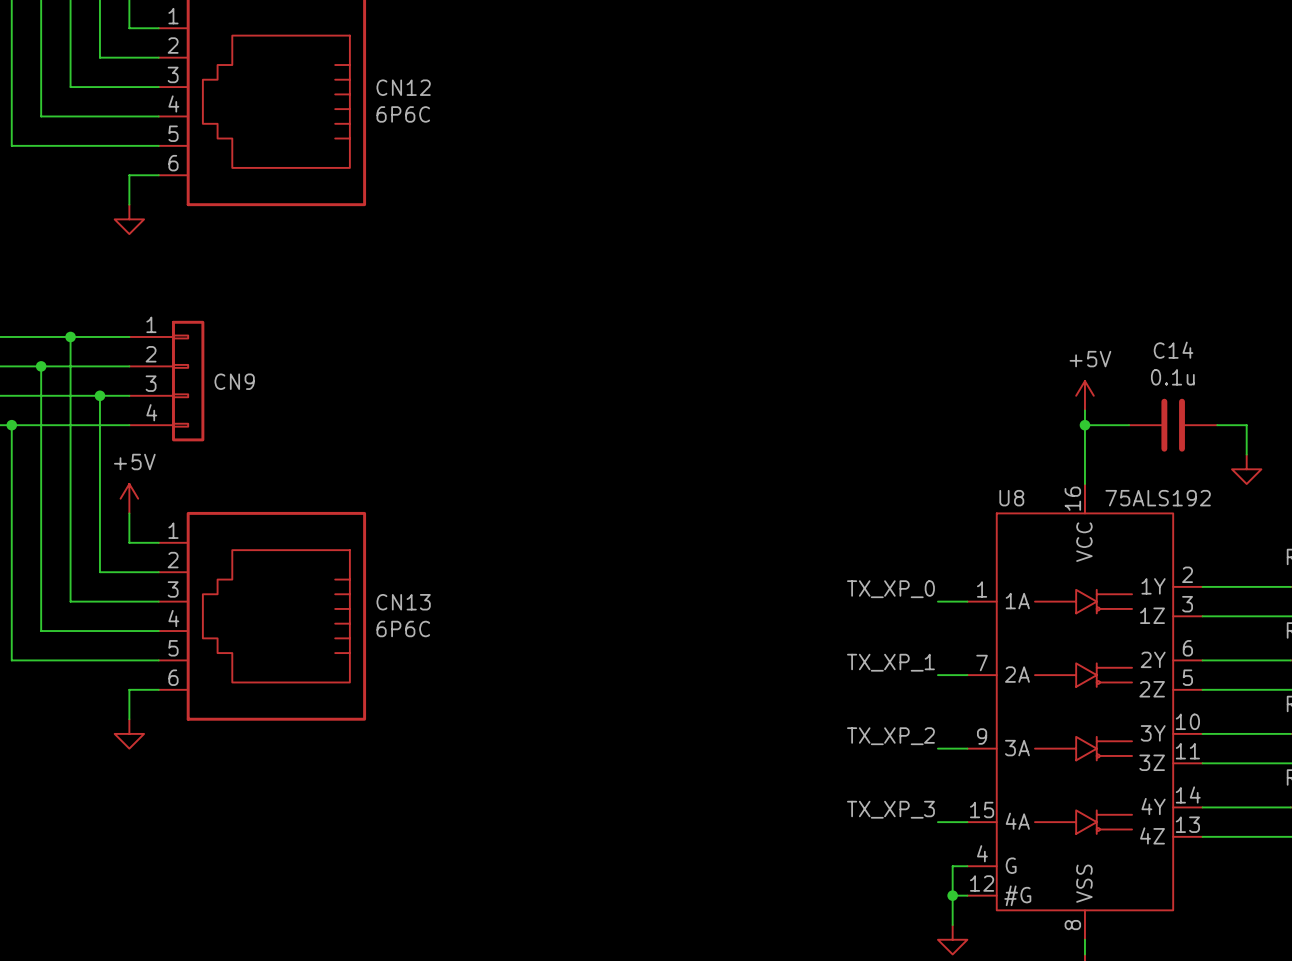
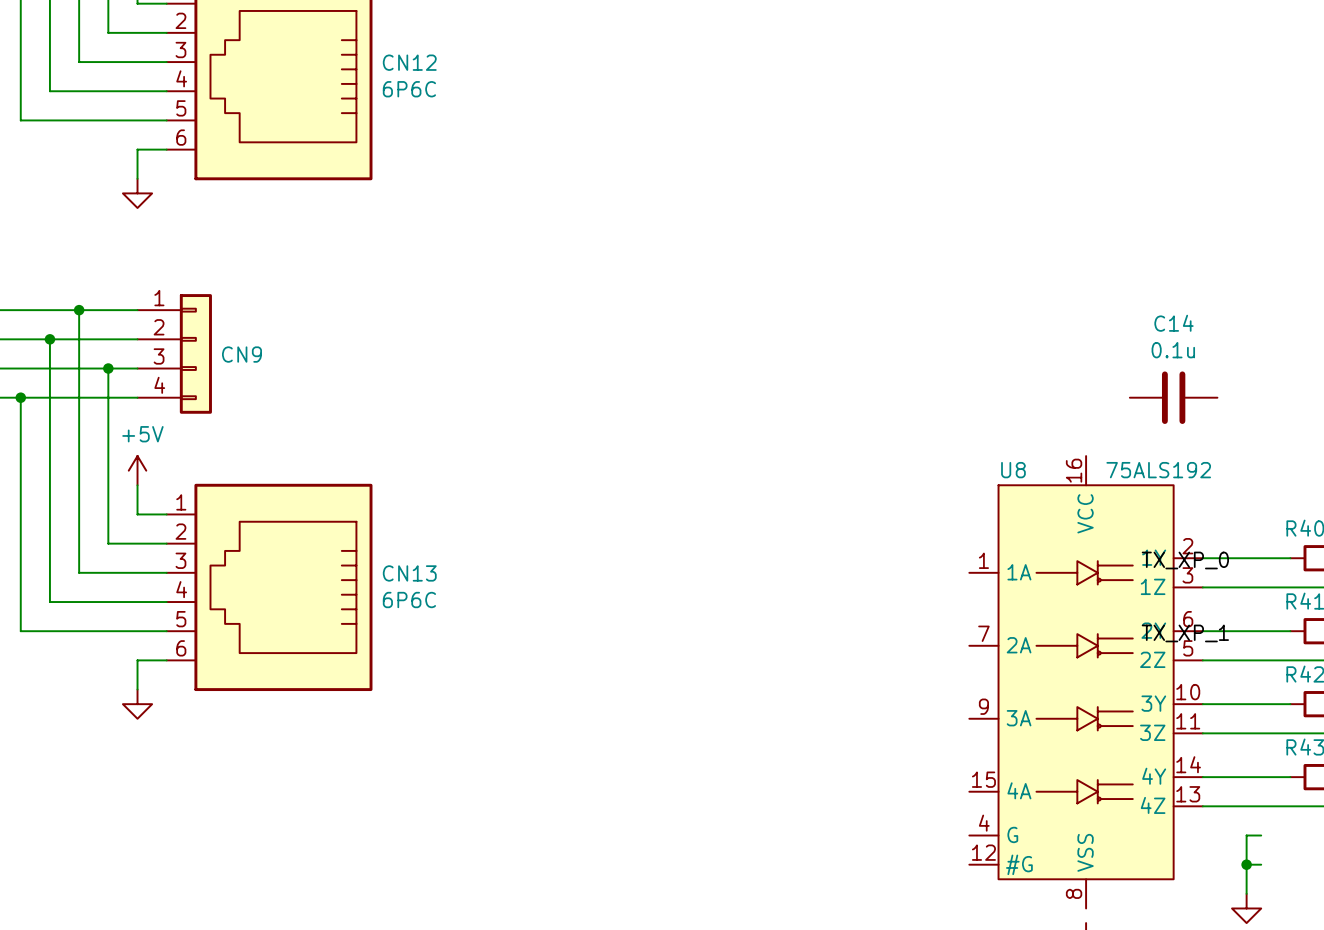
power symbol: +5V (1084, 395) -> none
wire: (1084, 410) (1084, 484) -> none
wire: (1084, 425) (1129, 425) -> none
junction: (1084, 425) -> none
wire: (1217, 425) (1246, 425) (1246, 454) -> none
power symbol: (1246, 469) -> none
label: TX_XP_0 (890, 589) -> none
label: none -> TX_XP_0 (1185, 560)
wire: (937, 601) (967, 601) -> none
label: TX_XP_1 (890, 662) -> none
label: none -> TX_XP_1 (1185, 633)
wire: (937, 675) (967, 675) -> none
label: TX_XP_2 (890, 736) -> none
wire: (937, 748) (967, 748) -> none
label: TX_XP_3 (890, 809) -> none
wire: (937, 822) (967, 822) -> none
wire: (967, 866) (952, 866) (952, 925) -> none
wire: none -> (1261, 835) (1246, 835) (1246, 893)
wire: (952, 895) (967, 895) -> none
junction: (952, 895) -> none
wire: none -> (1246, 864) (1261, 864)
junction: none -> (1246, 864)
power symbol: (952, 939) -> none
wire: (1084, 939) (1084, 954) -> none
power symbol: none -> (1246, 908)

